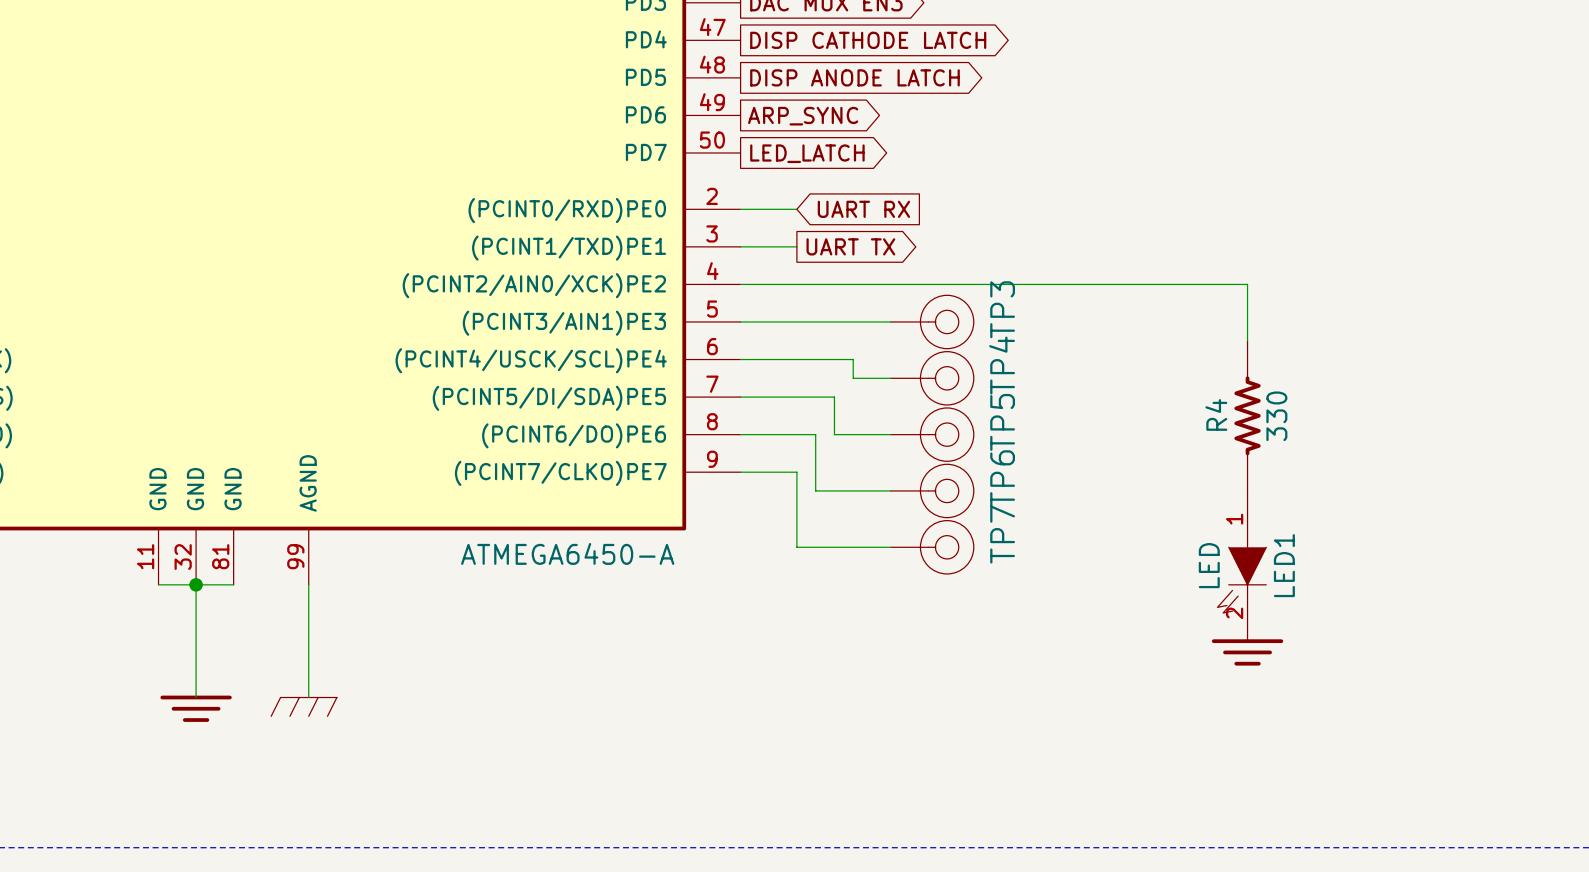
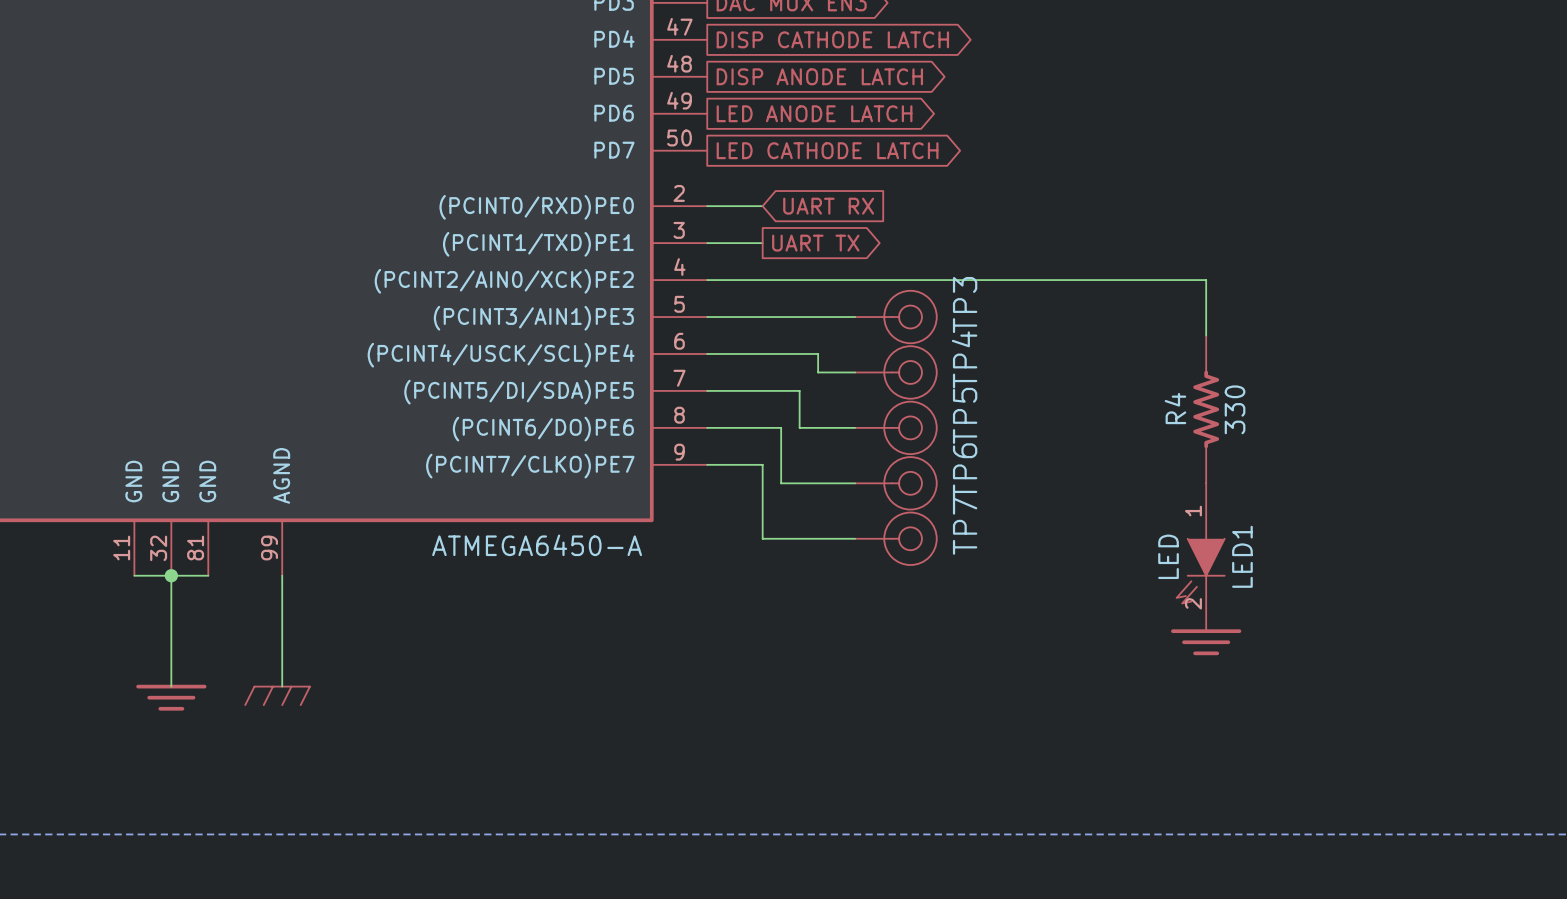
global label: ARP_SYNC (803, 116) -> LED ANODE LATCH (814, 113)
global label: LED_LATCH (807, 153) -> LED CATHODE LATCH (827, 150)

